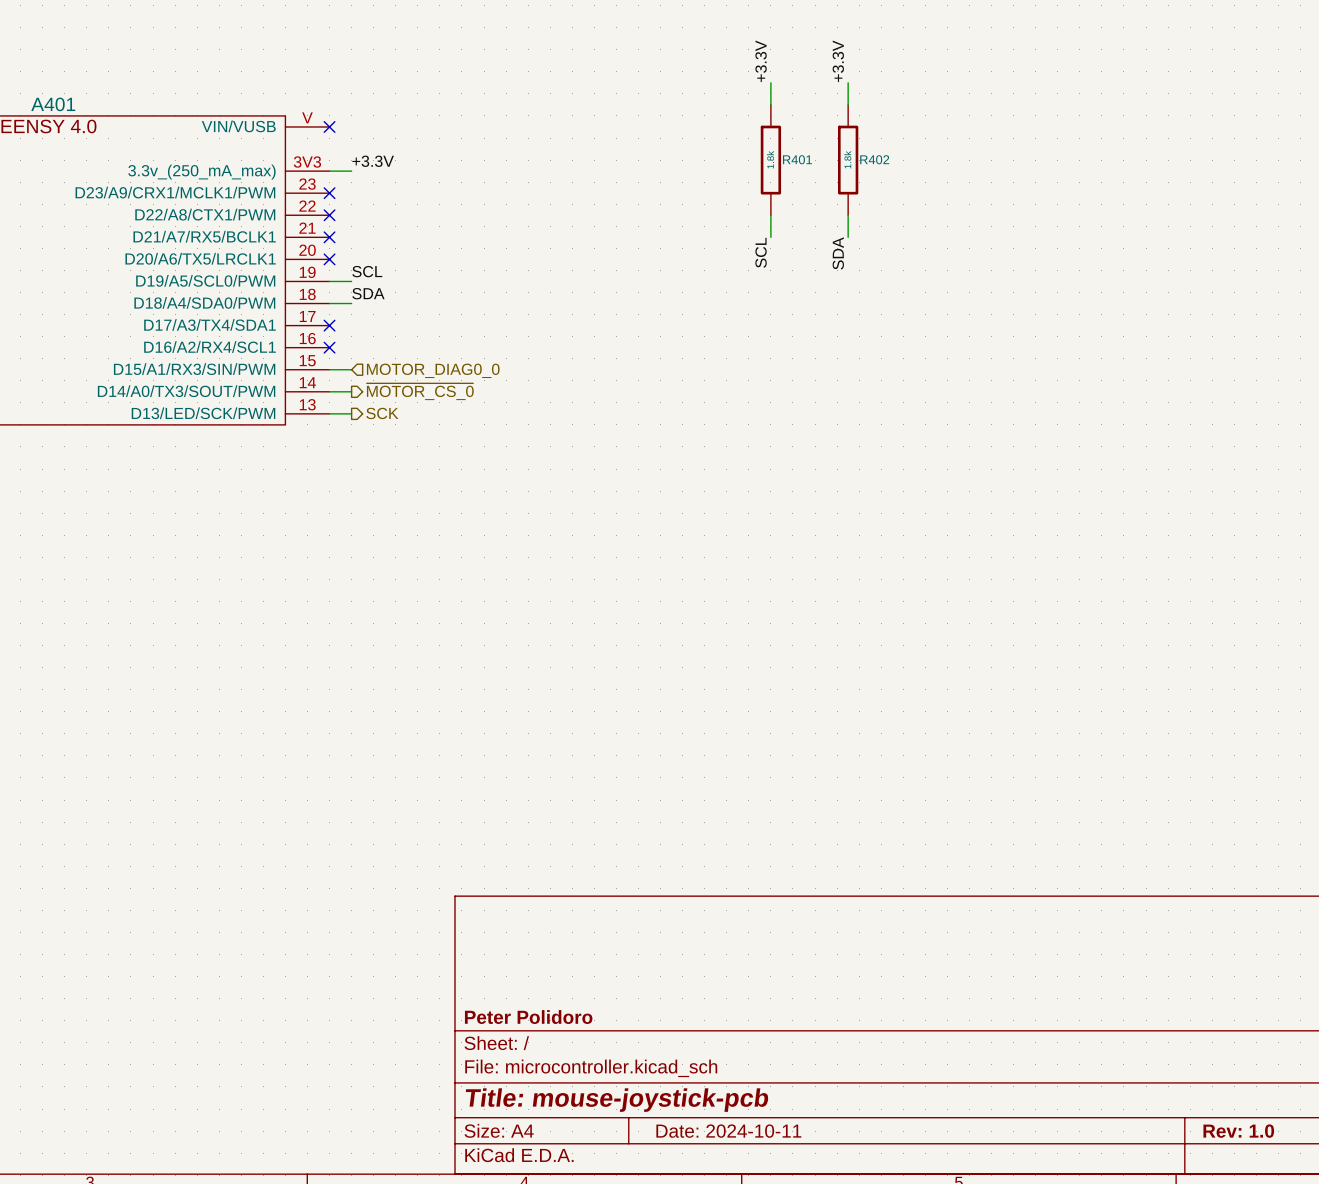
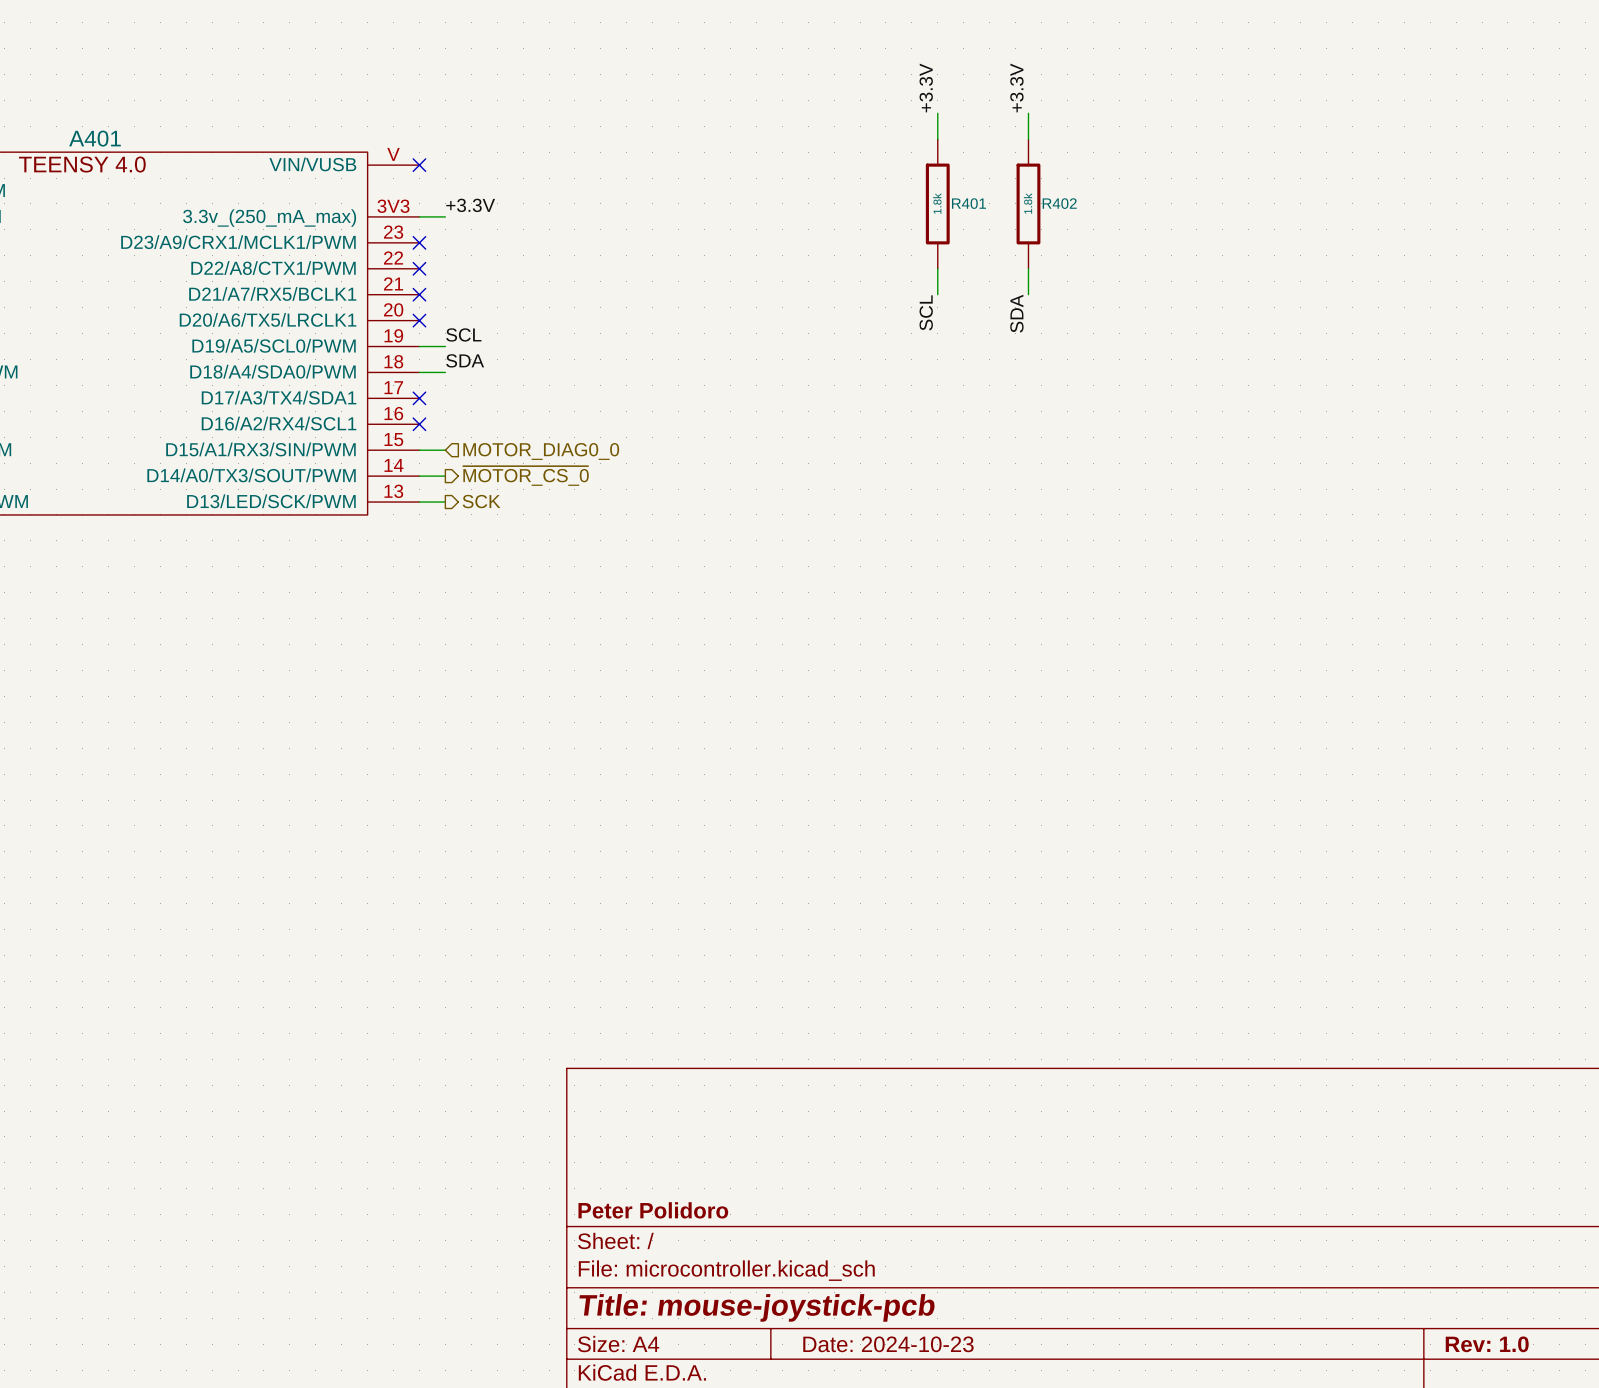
title block: Date: 2024-10-11 (728, 1131) -> Date: 2024-10-23 (888, 1344)

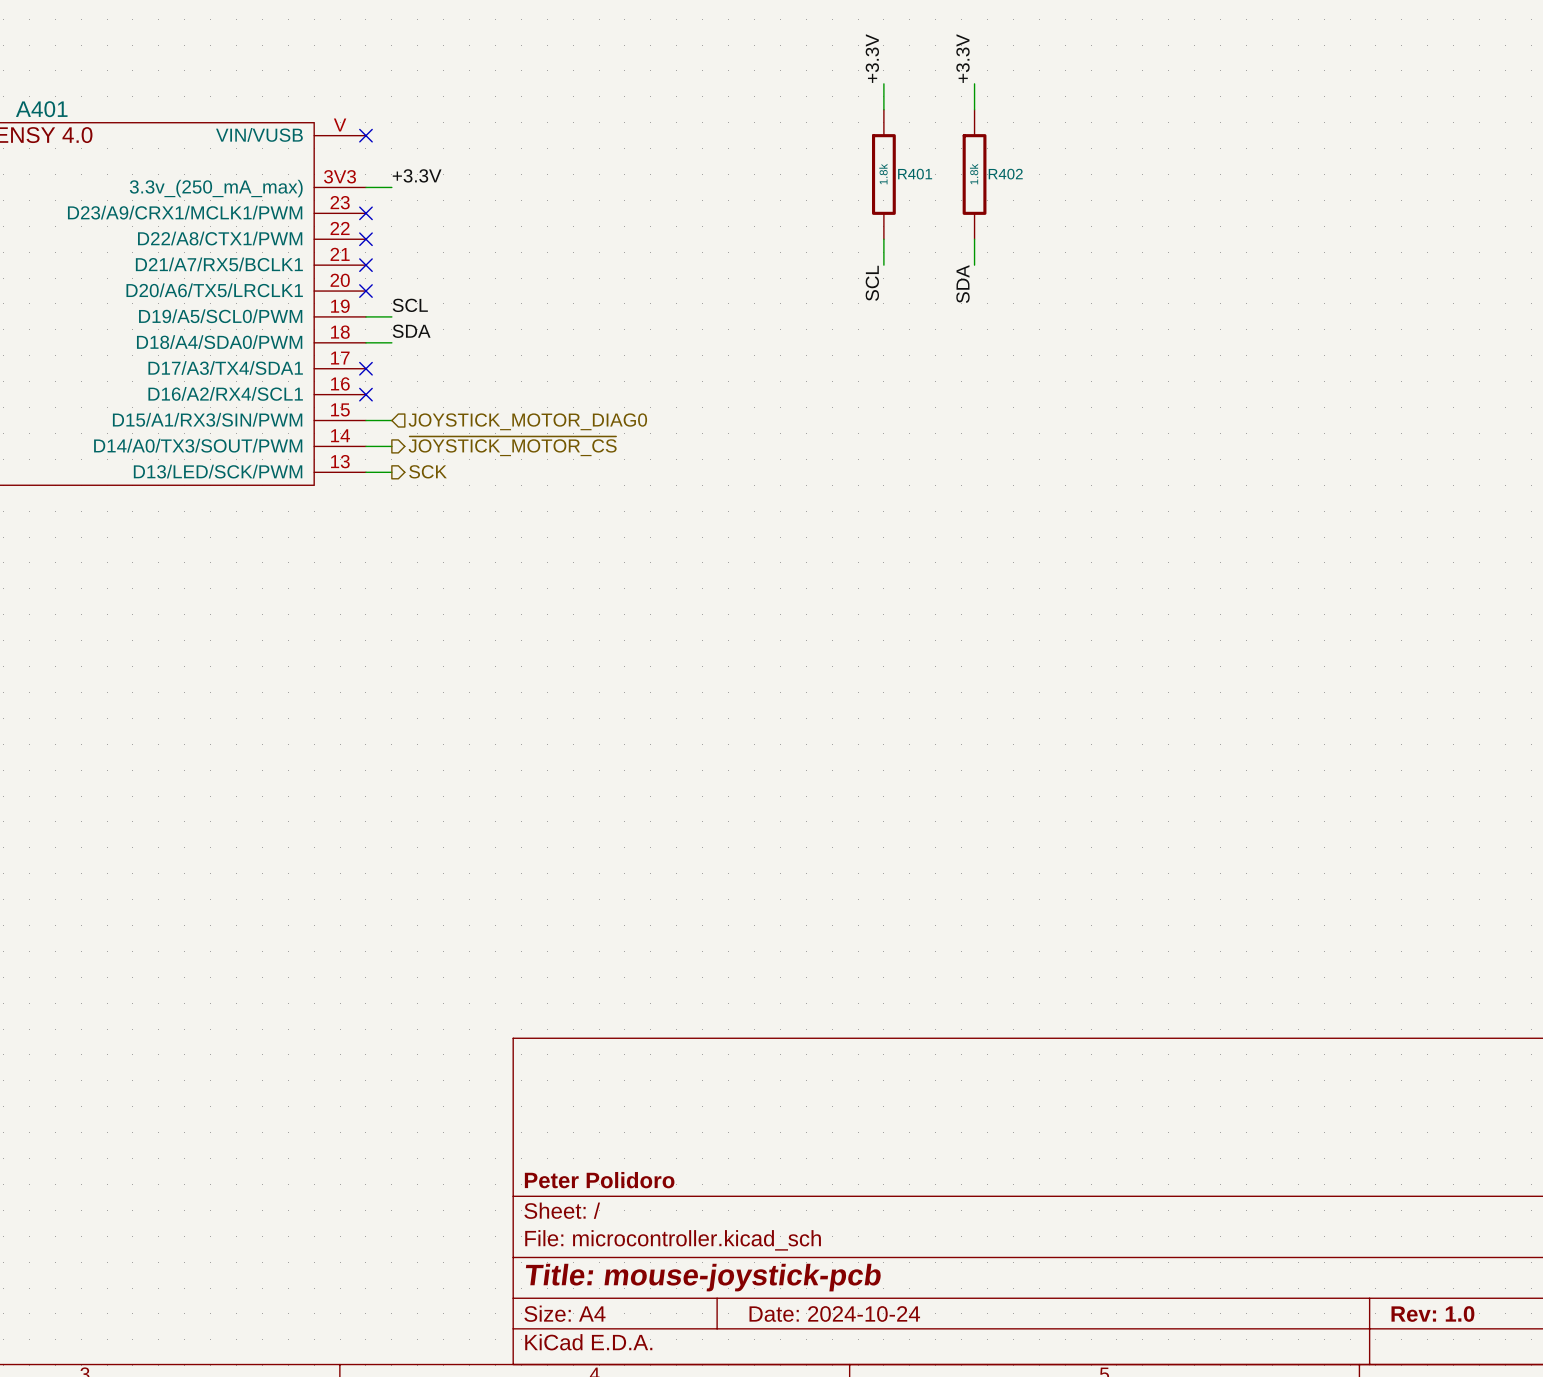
hierarchical label: MOTOR_DIAG0_0 (541, 451) -> JOYSTICK_MOTOR_DIAG0 (527, 421)
hierarchical label: ~{MOTOR_CS_0} (525, 476) -> ~{JOYSTICK_MOTOR_CS} (512, 446)
title block: Date: 2024-10-23 (888, 1344) -> Date: 2024-10-24 (834, 1313)

